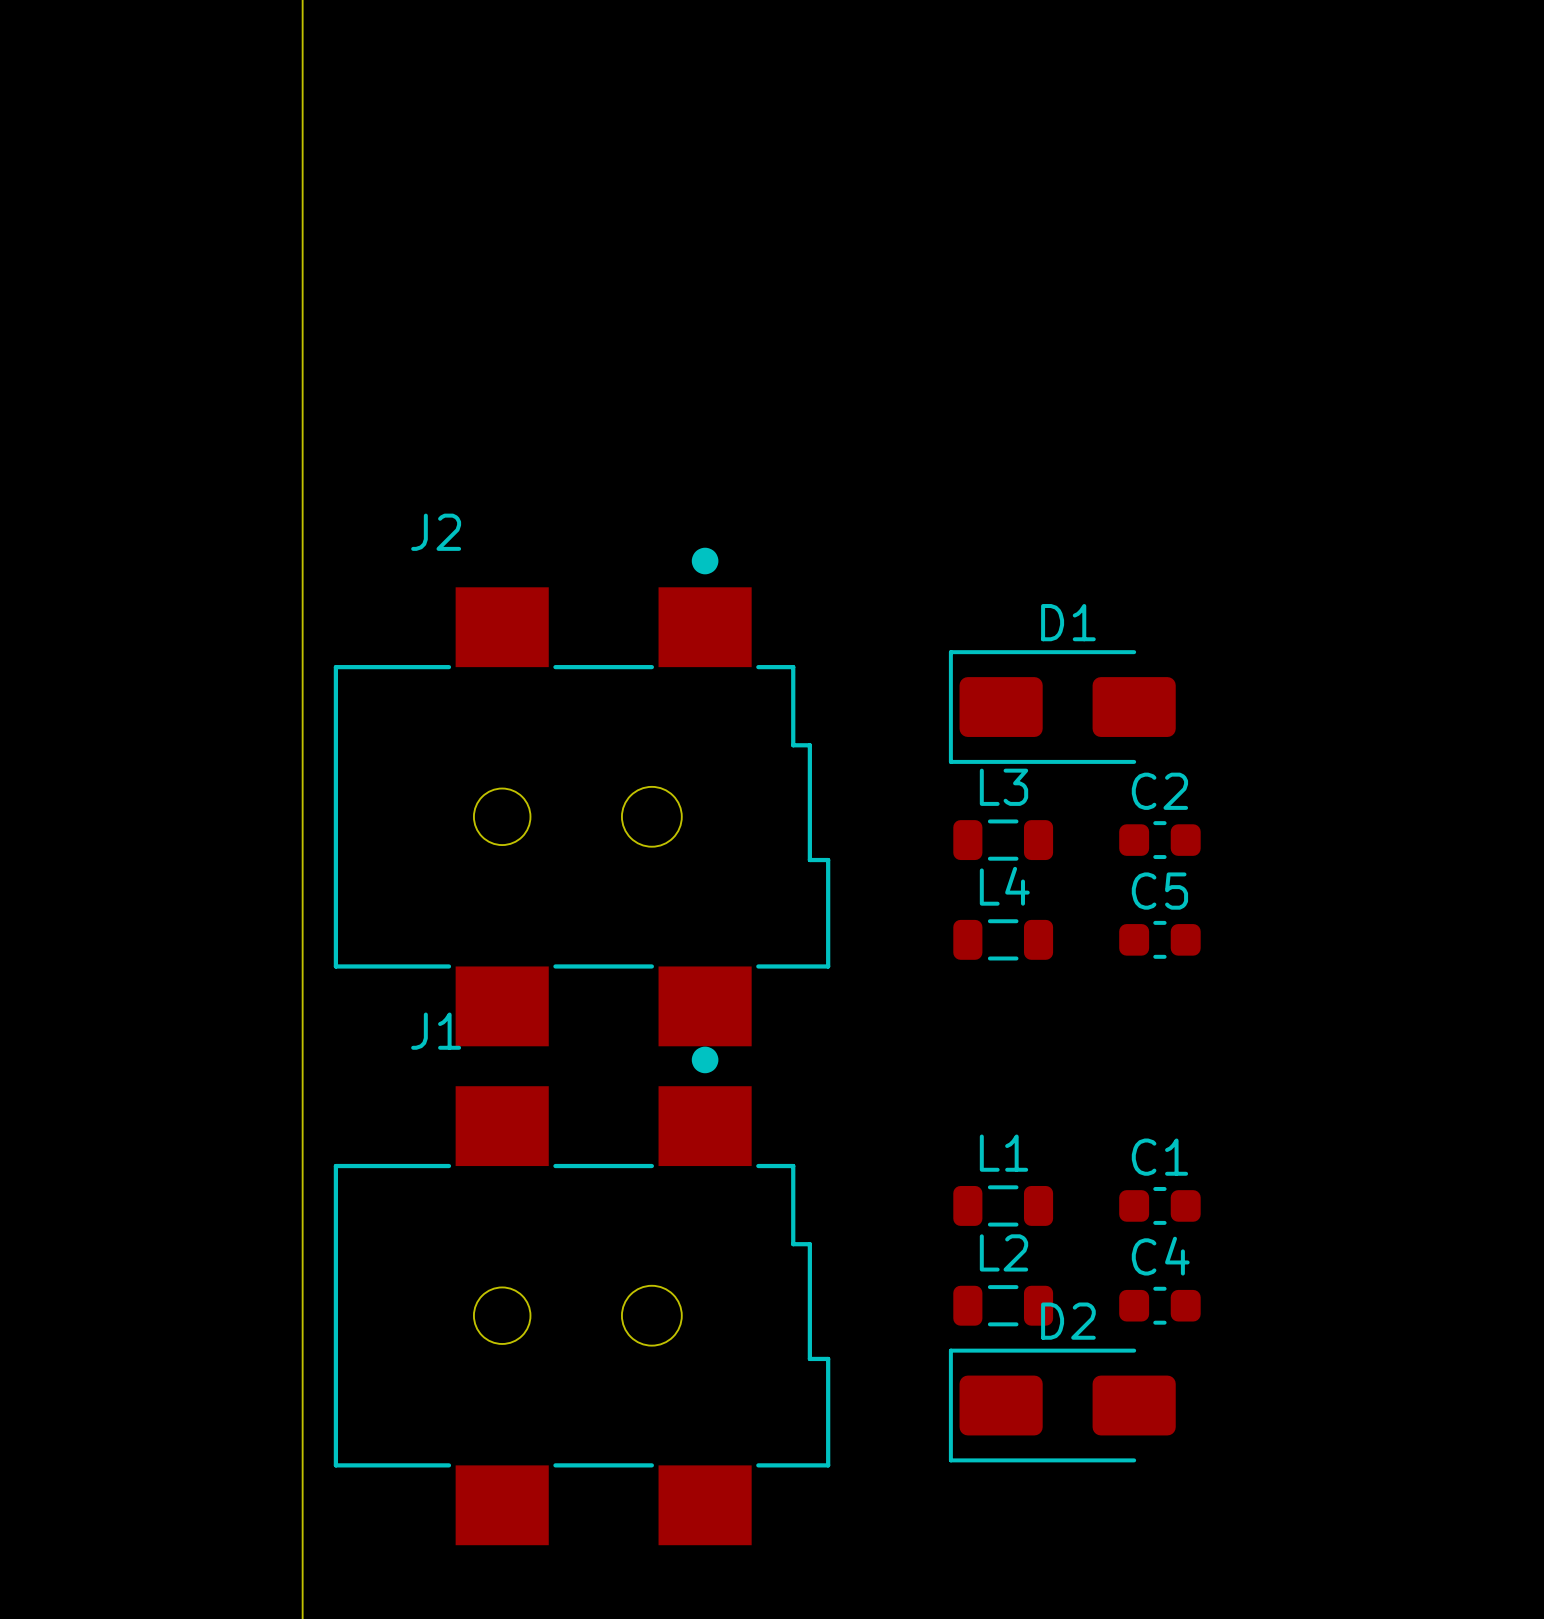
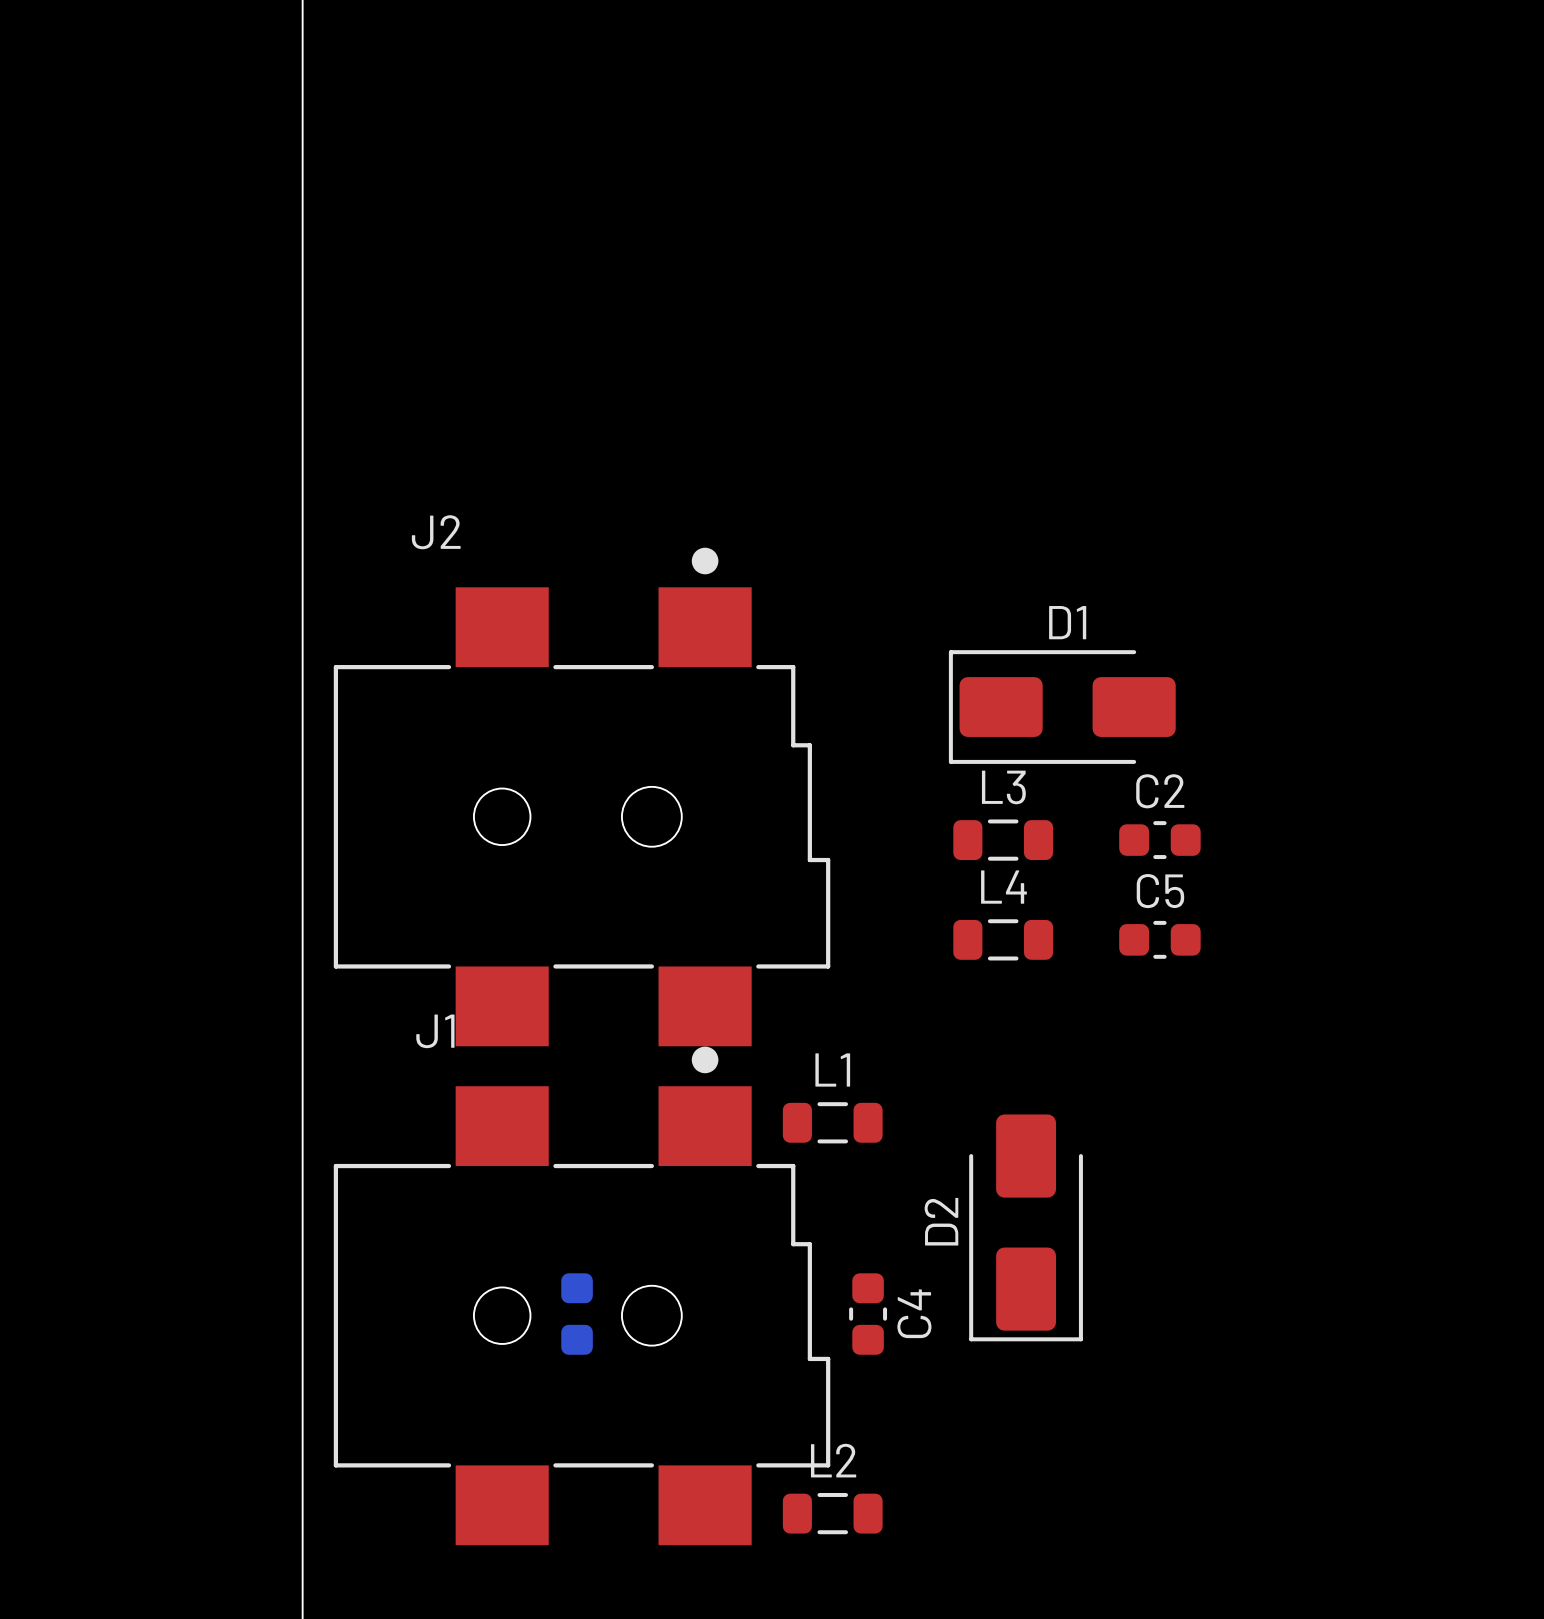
L1 position: (1003, 1205) -> (832, 1122)
C1 side: top (1159, 1205) -> bottom (577, 1314)
L2 position: (1003, 1305) -> (832, 1513)
C4 rotation: 0° (1159, 1305) -> 90° clockwise (868, 1314)
C4 position: (1159, 1305) -> (868, 1314)
D2 rotation: 0° (1062, 1405) -> 90° counterclockwise (1026, 1227)
D2 position: (1062, 1405) -> (1026, 1227)

